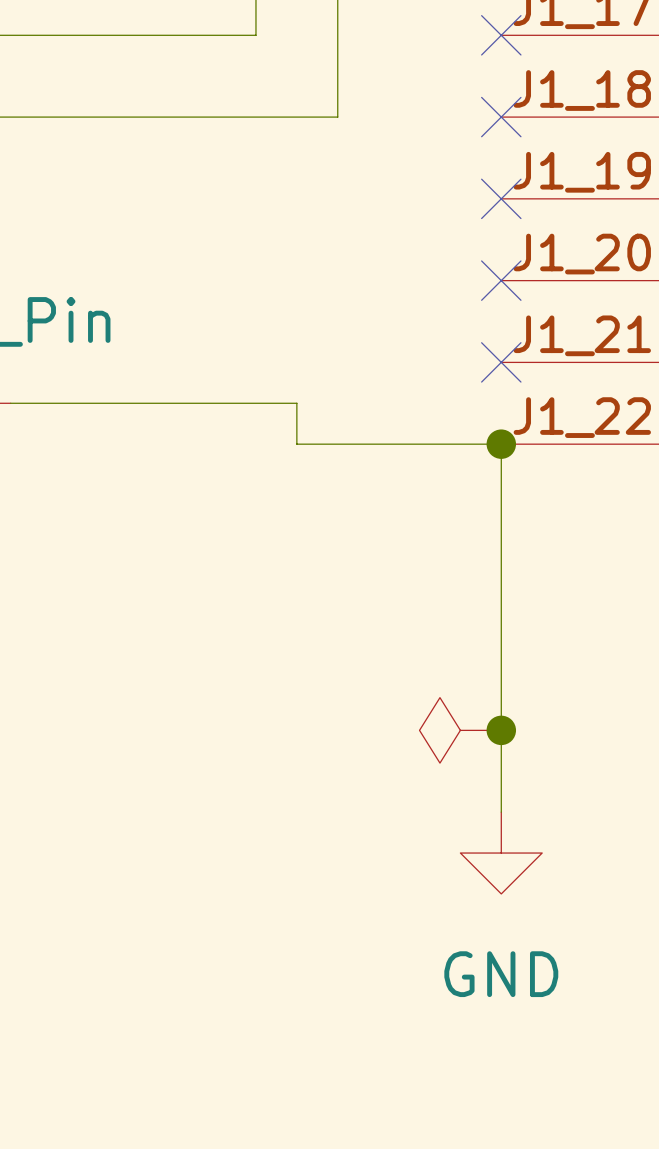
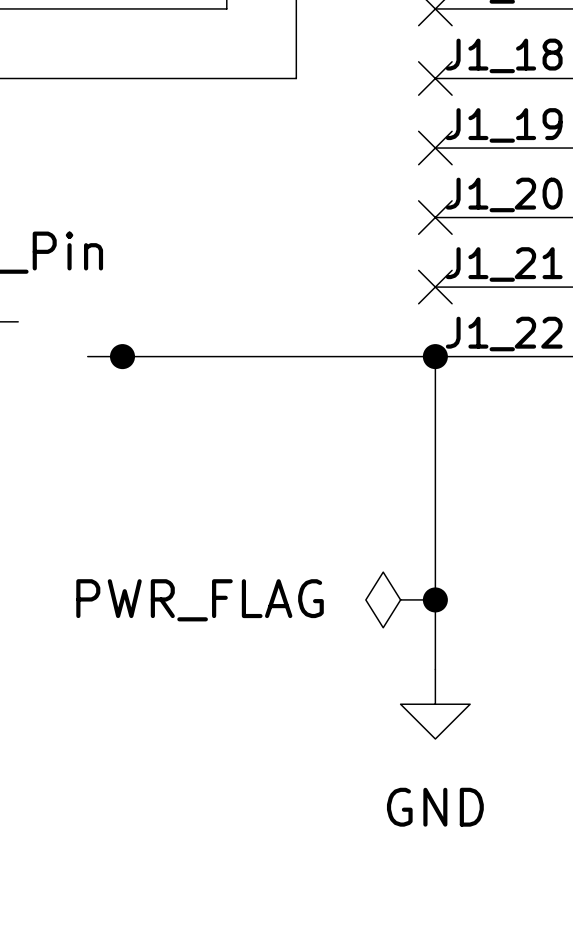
wire: (10, 403) (296, 403) (296, 444) -> (87, 356) (261, 356)
junction: none -> (122, 356)
power symbol text: none -> PWR_FLAG (200, 600)

